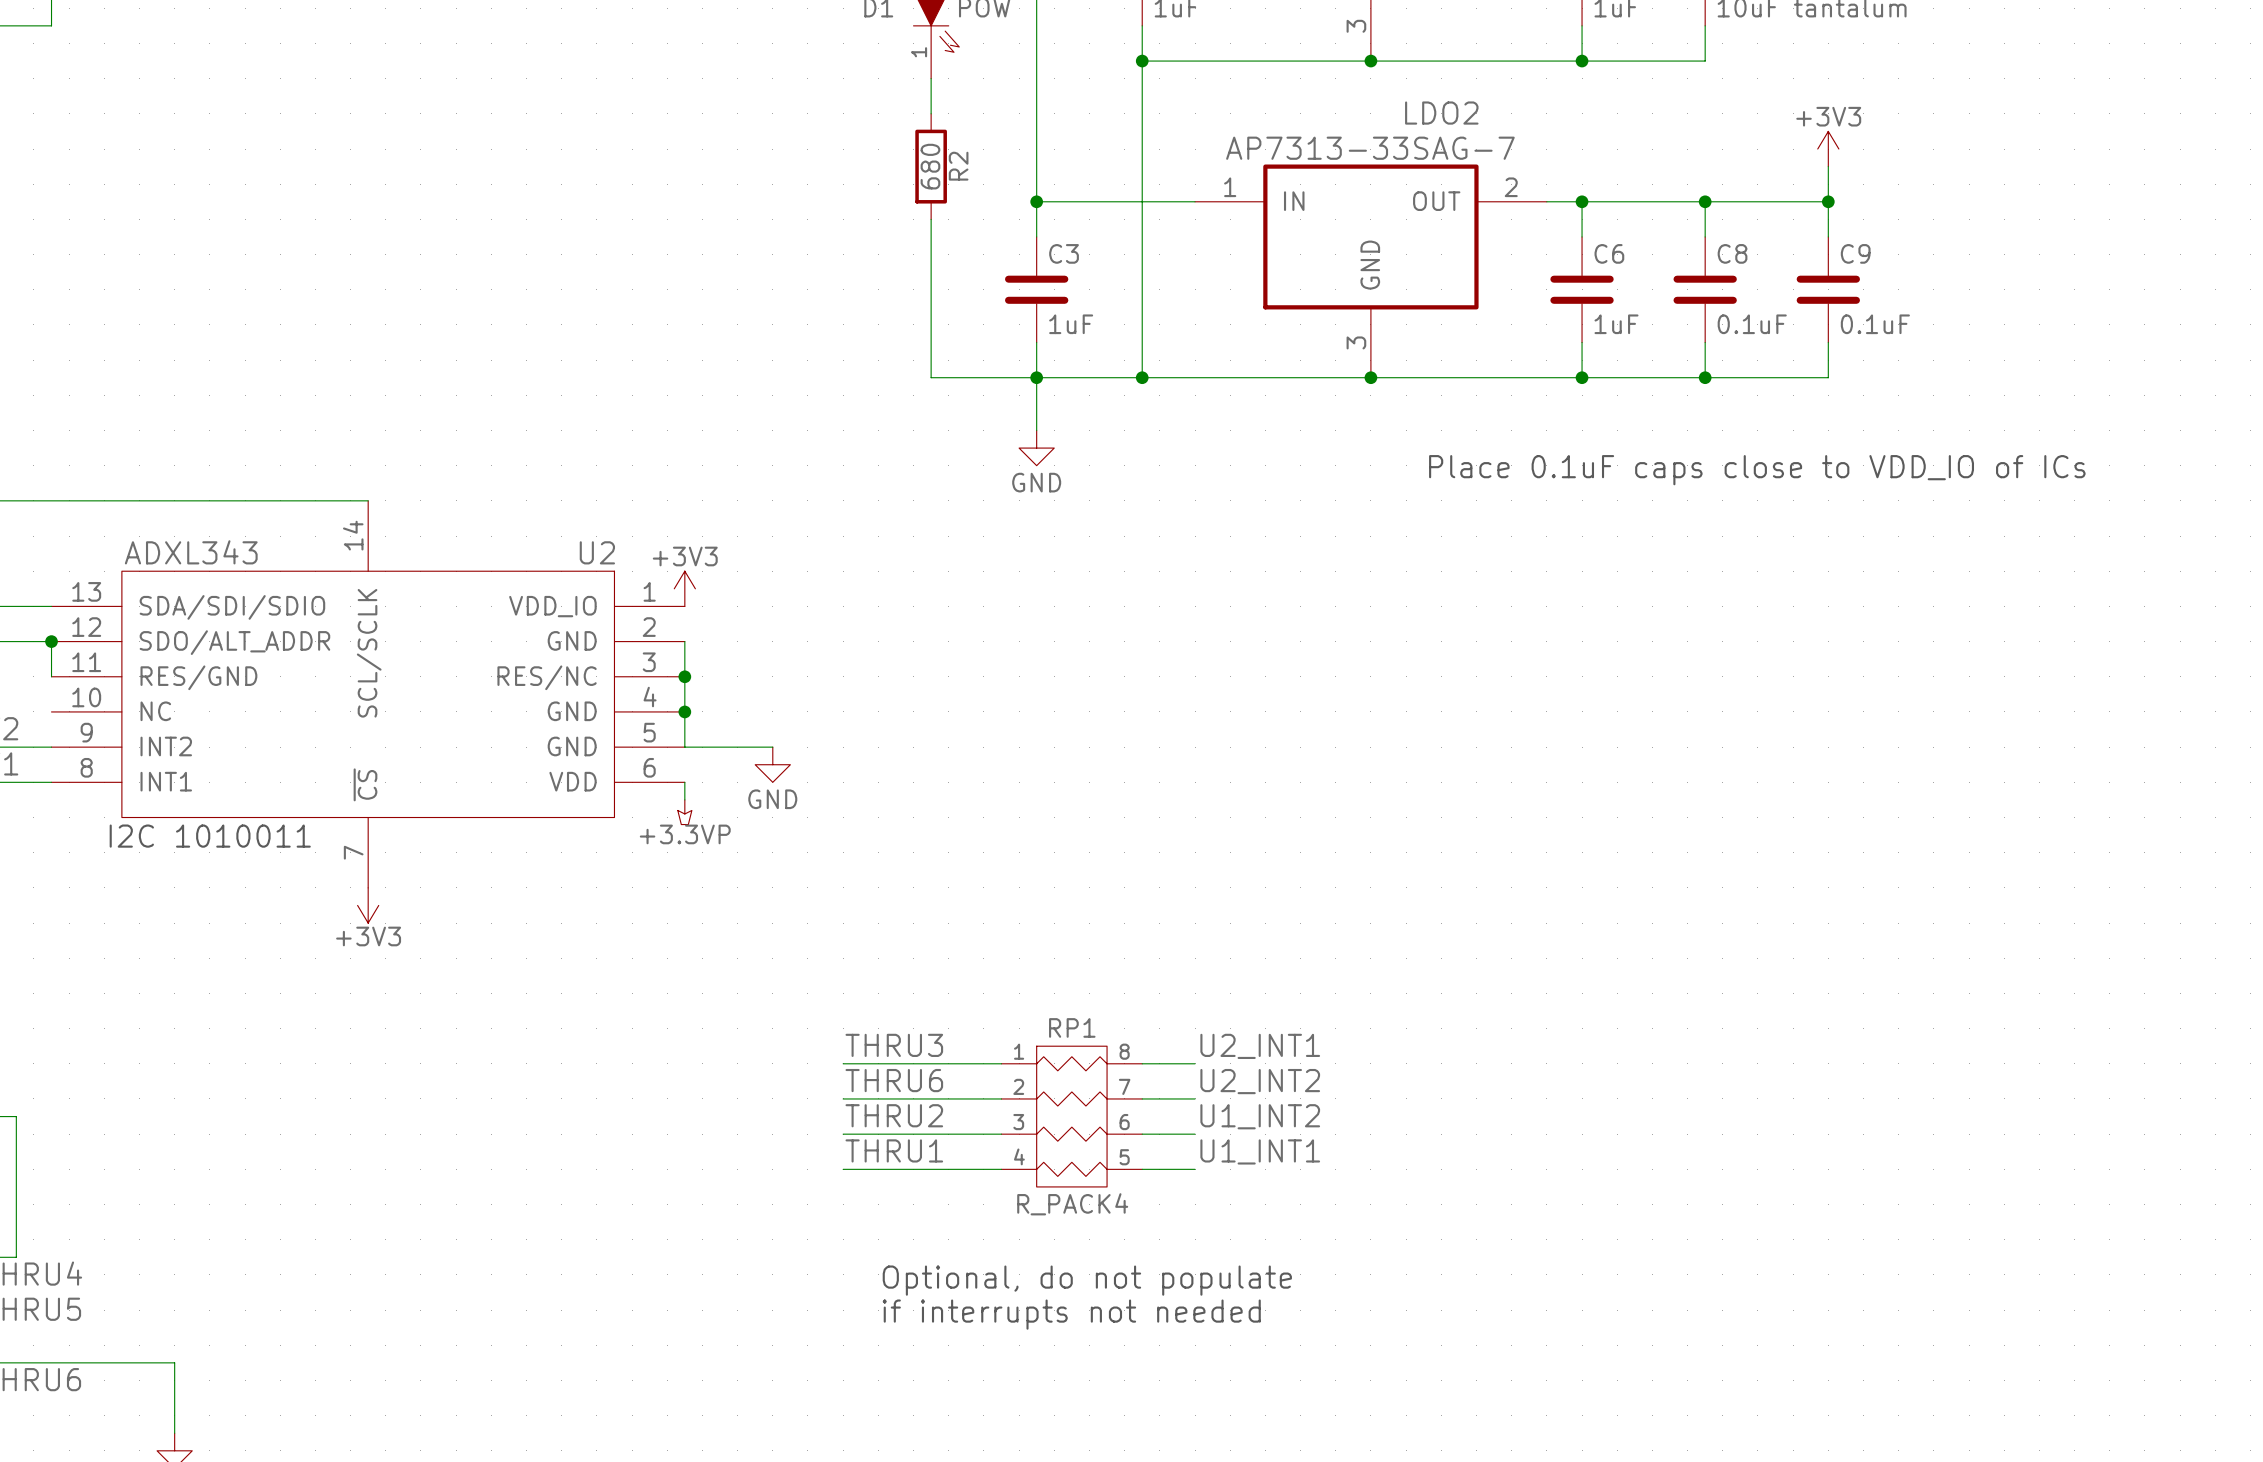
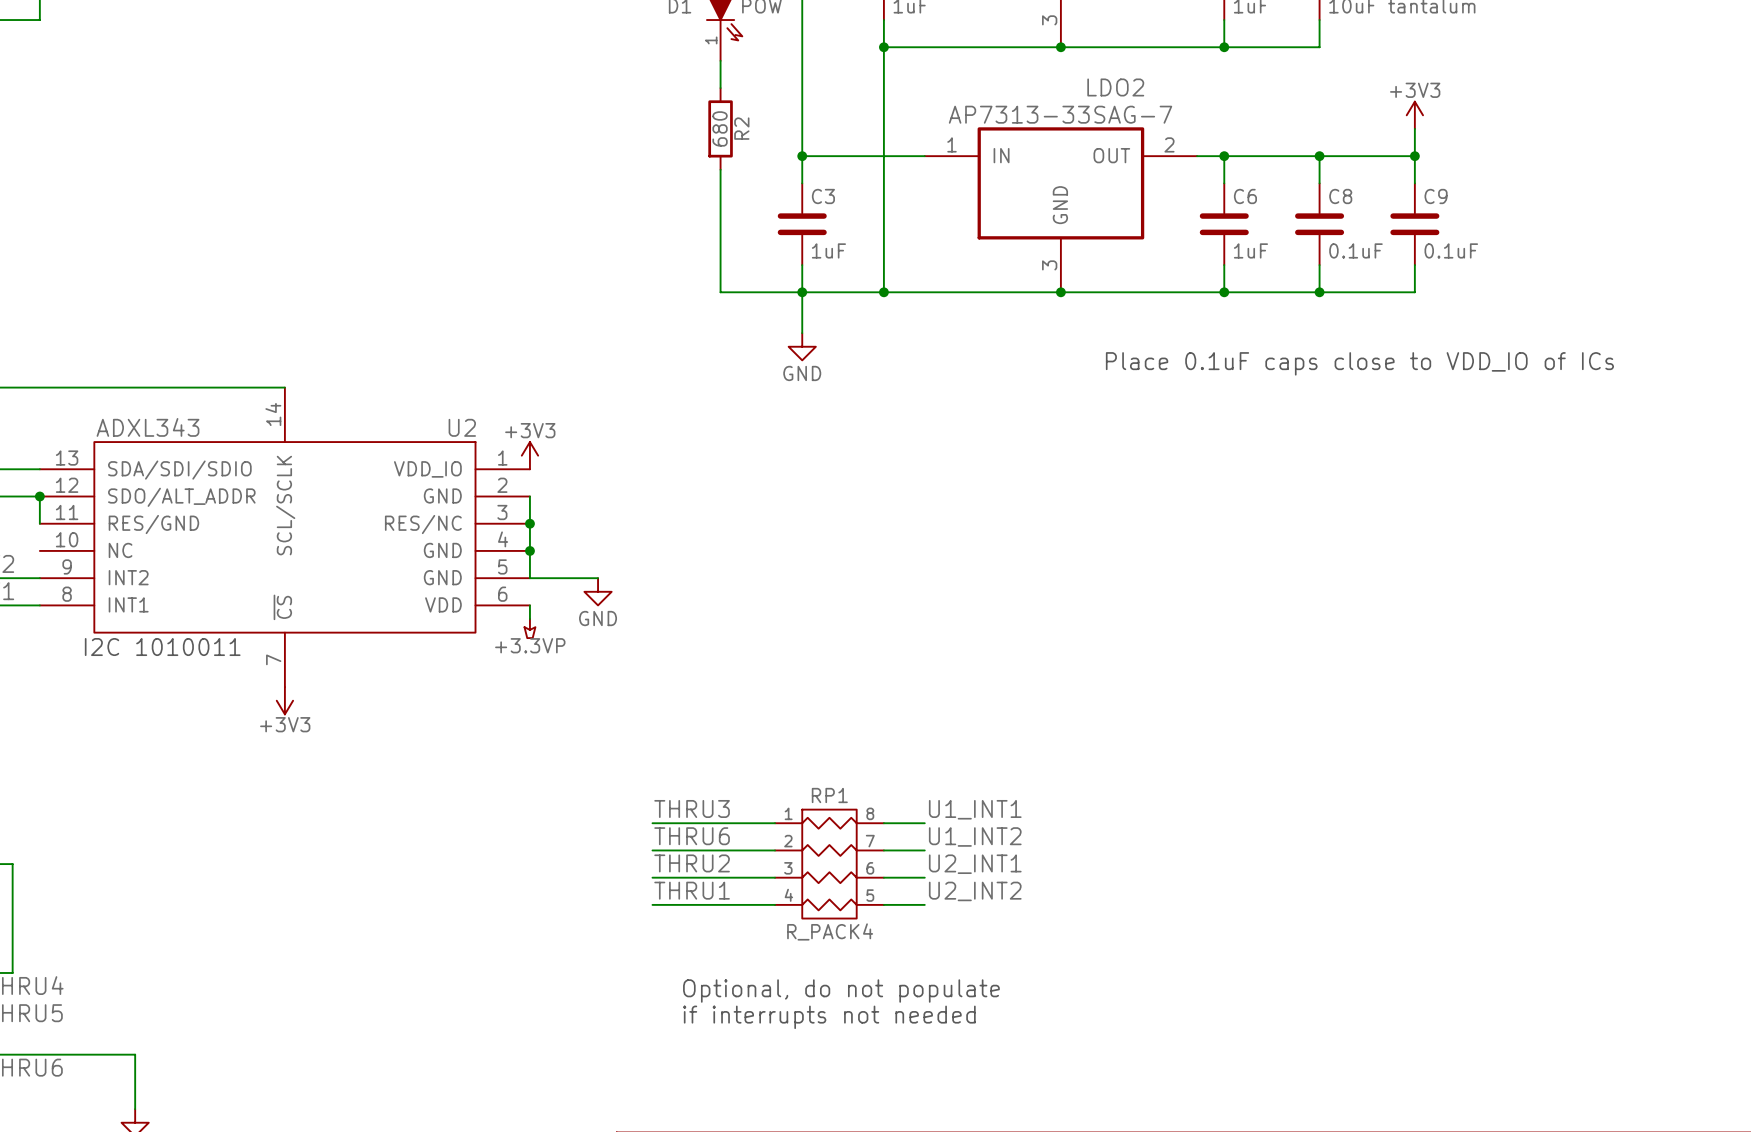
label: U2_INT1 (1260, 1046) -> U1_INT1 (975, 809)
label: U2_INT2 (1260, 1081) -> U1_INT2 (975, 836)
label: U1_INT2 (1260, 1116) -> U2_INT1 (975, 864)
label: U1_INT1 (1260, 1151) -> U2_INT2 (975, 891)

